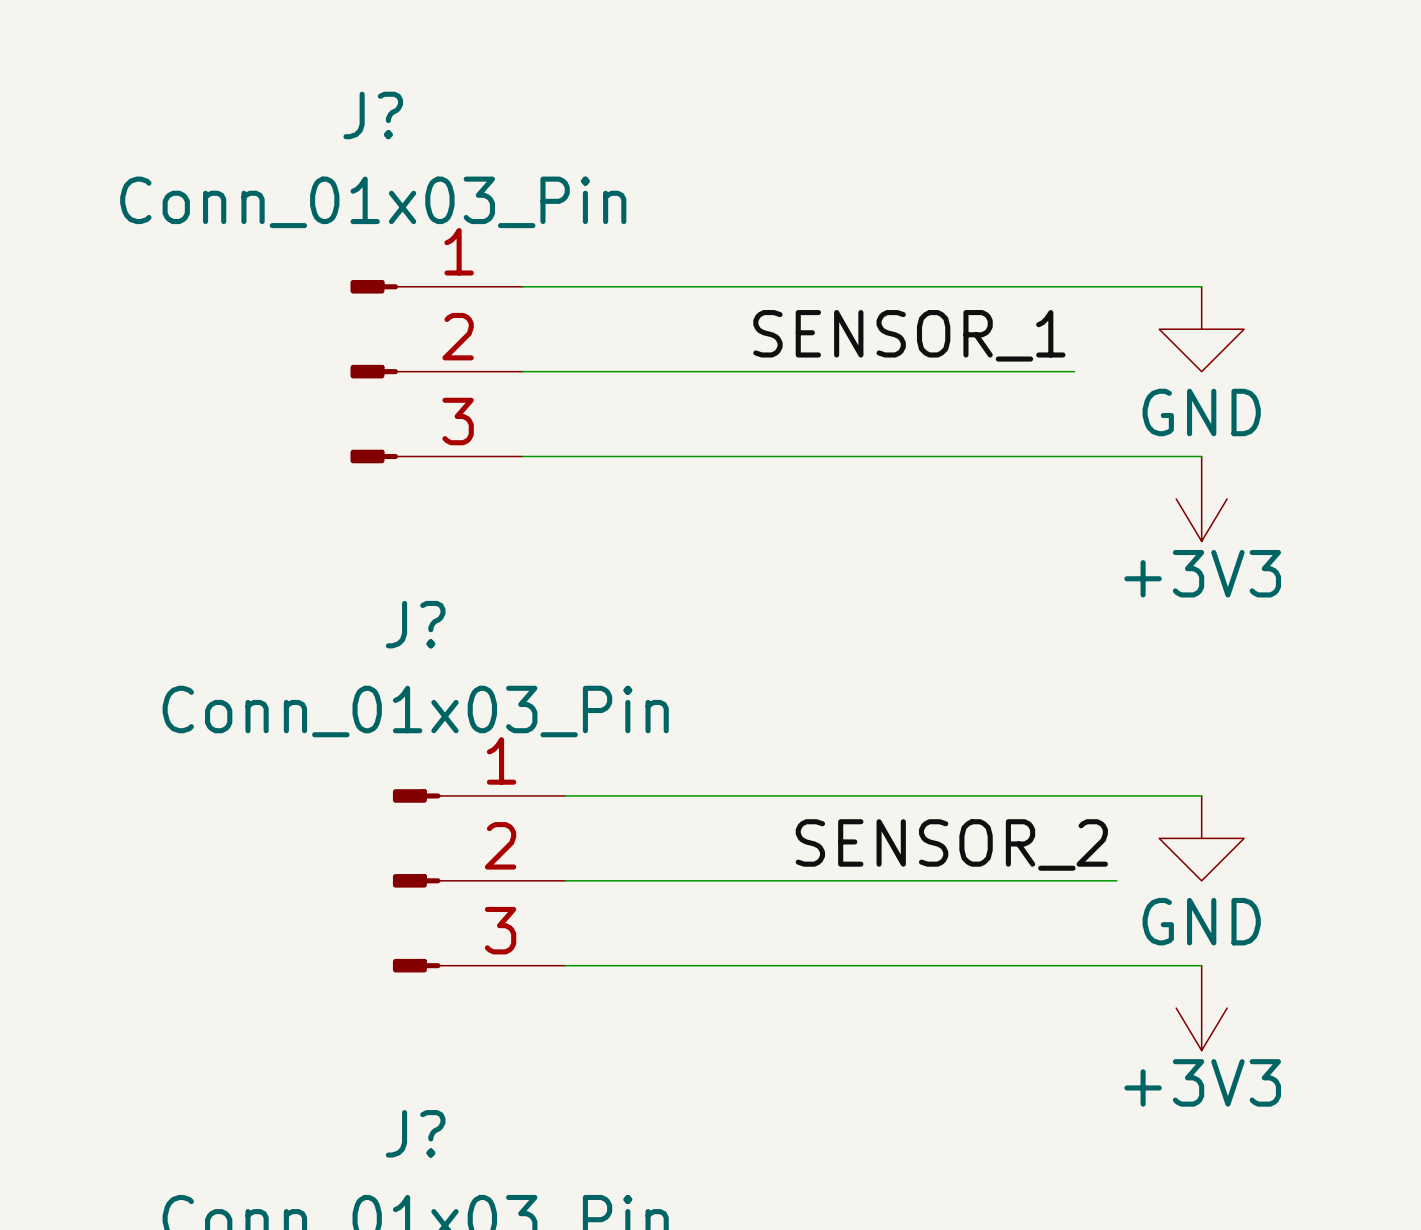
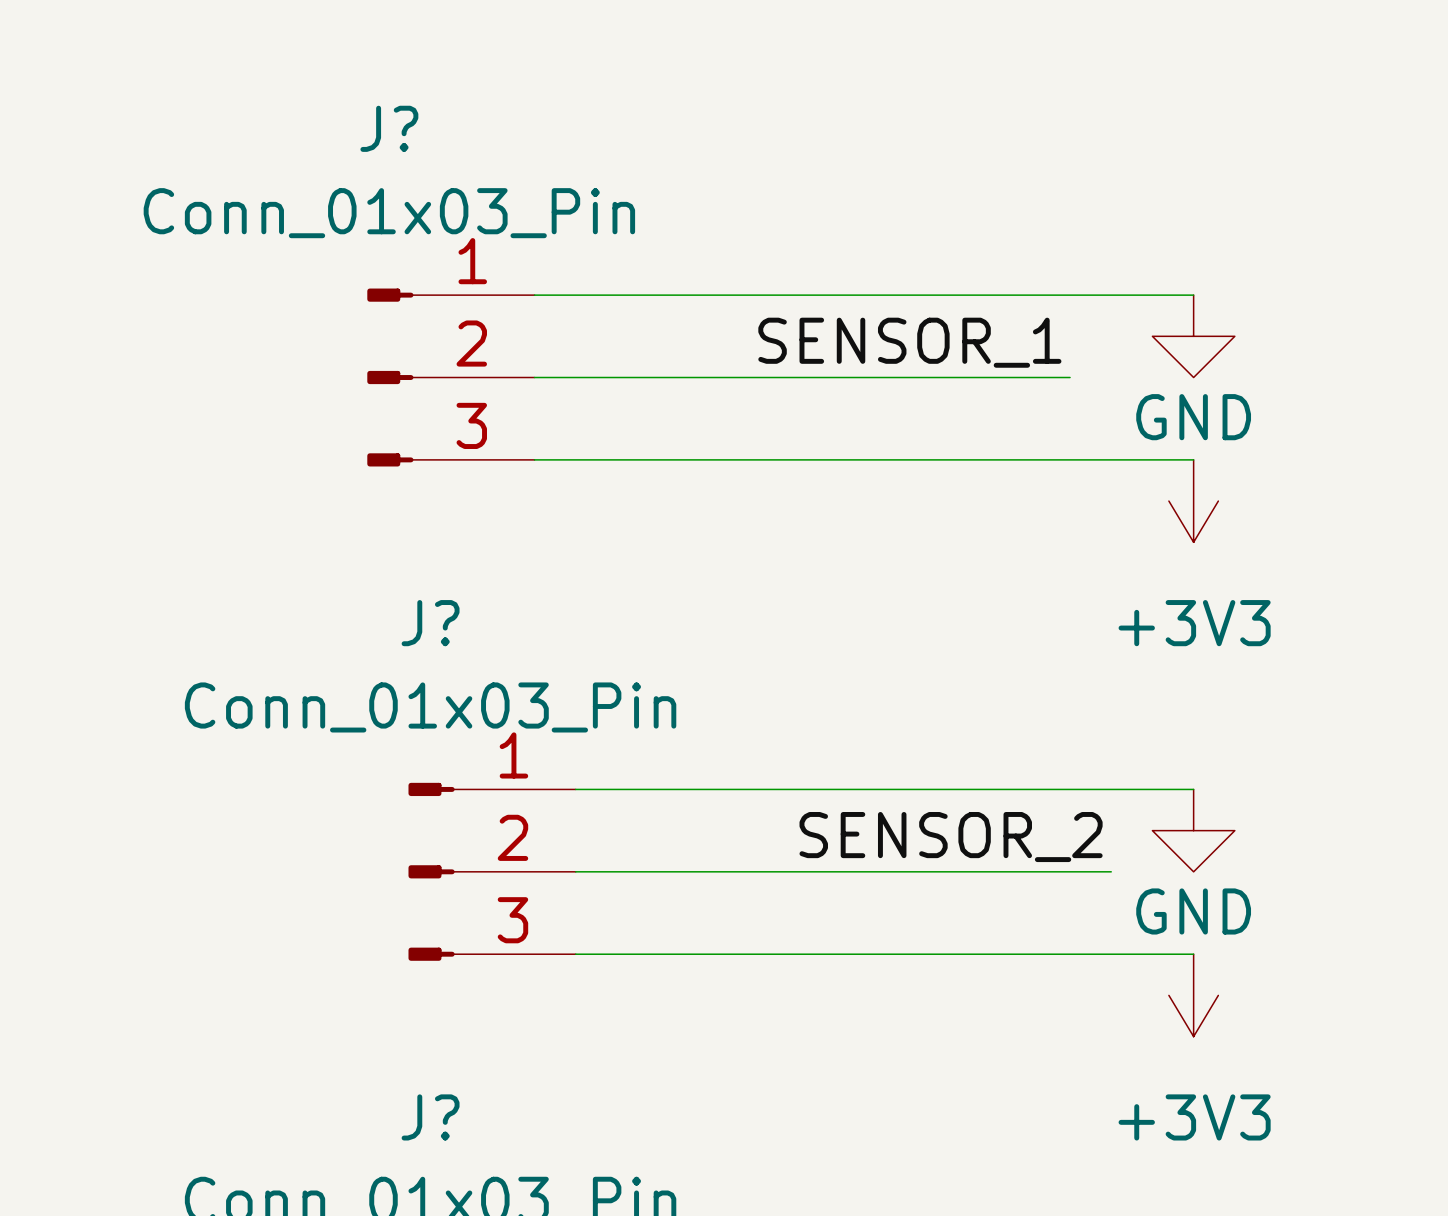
power symbol text position: +3V3 (1202, 573) -> +3V3 (1194, 623)
power symbol text position: +3V3 (1202, 1082) -> +3V3 (1194, 1117)

